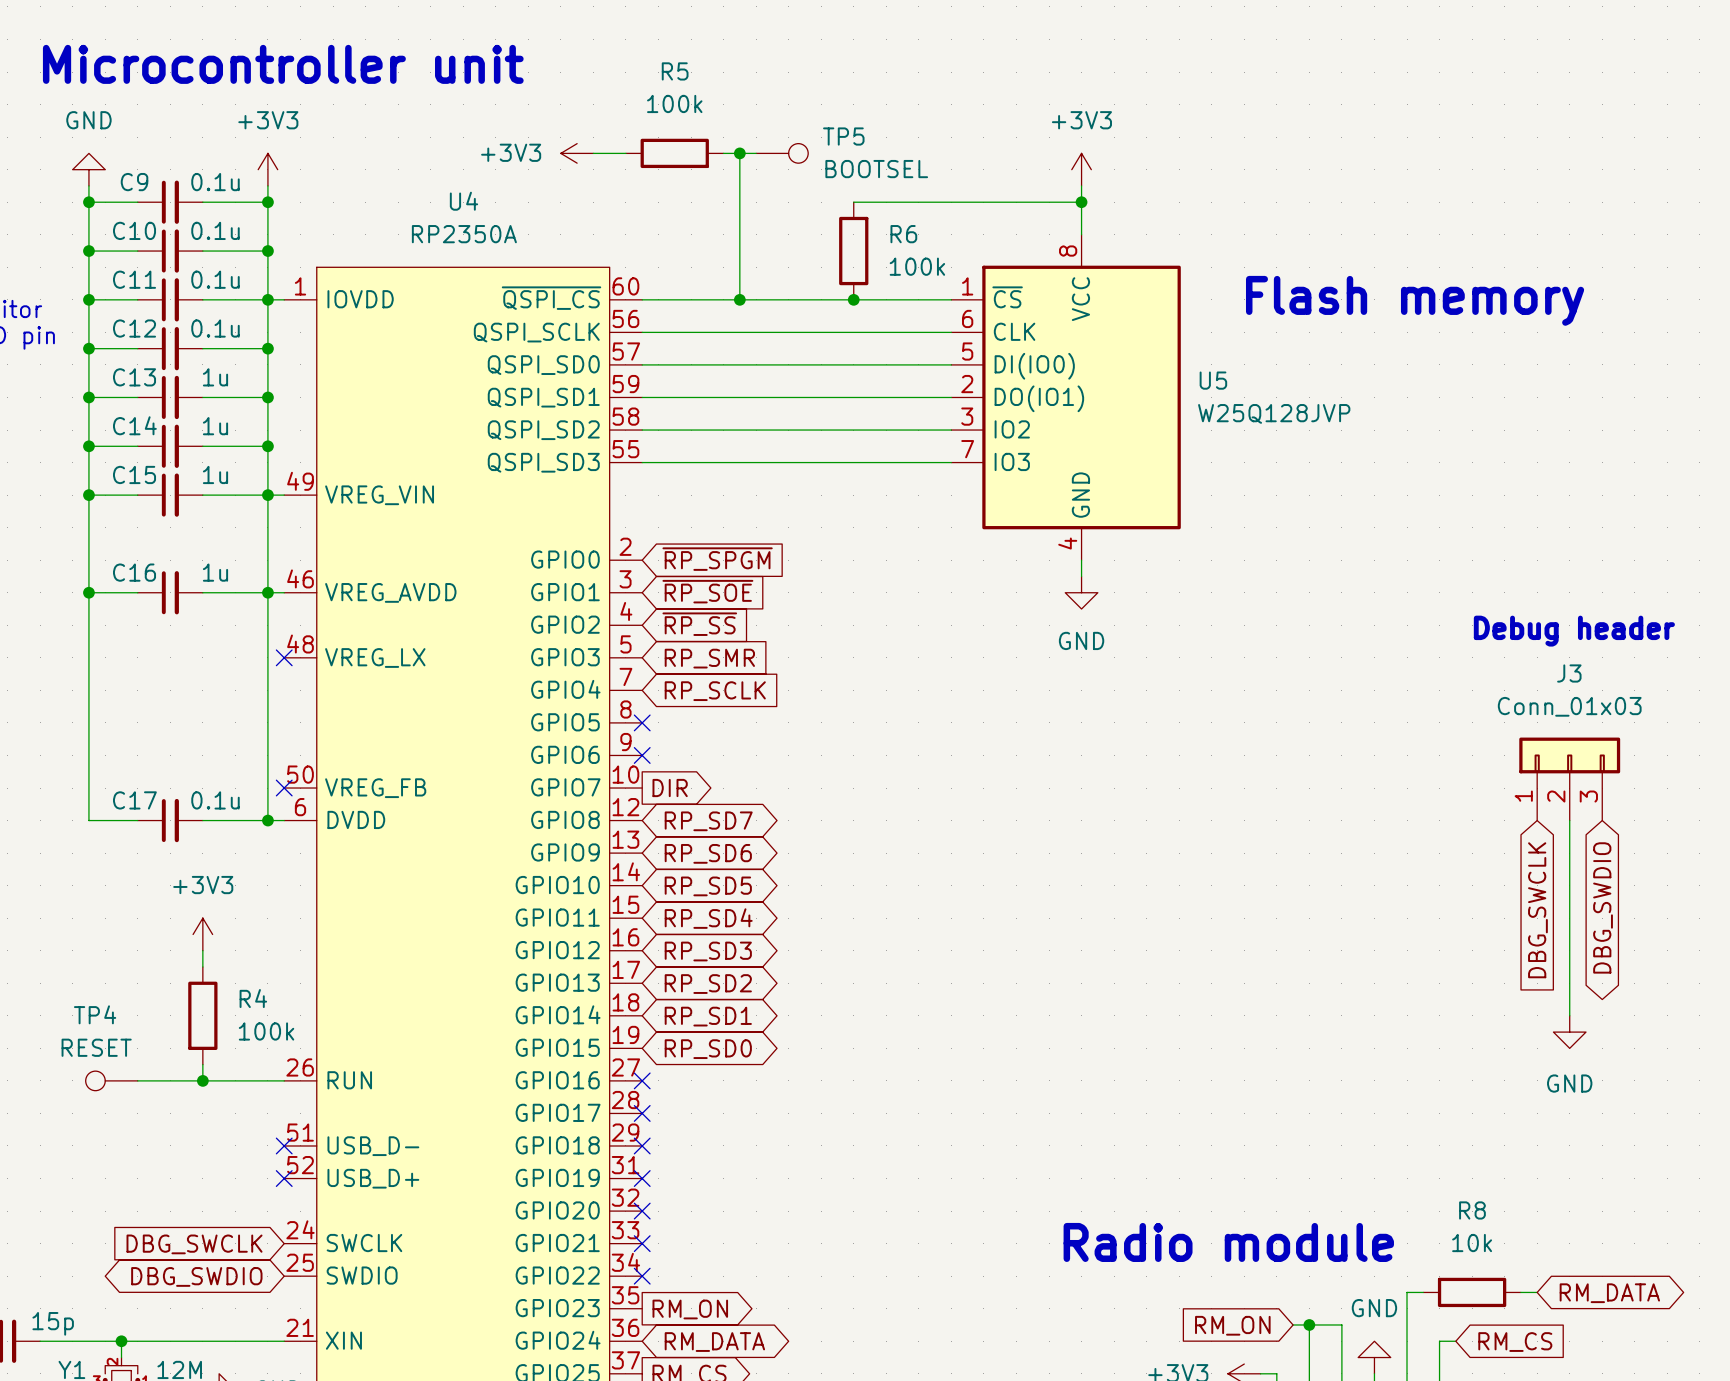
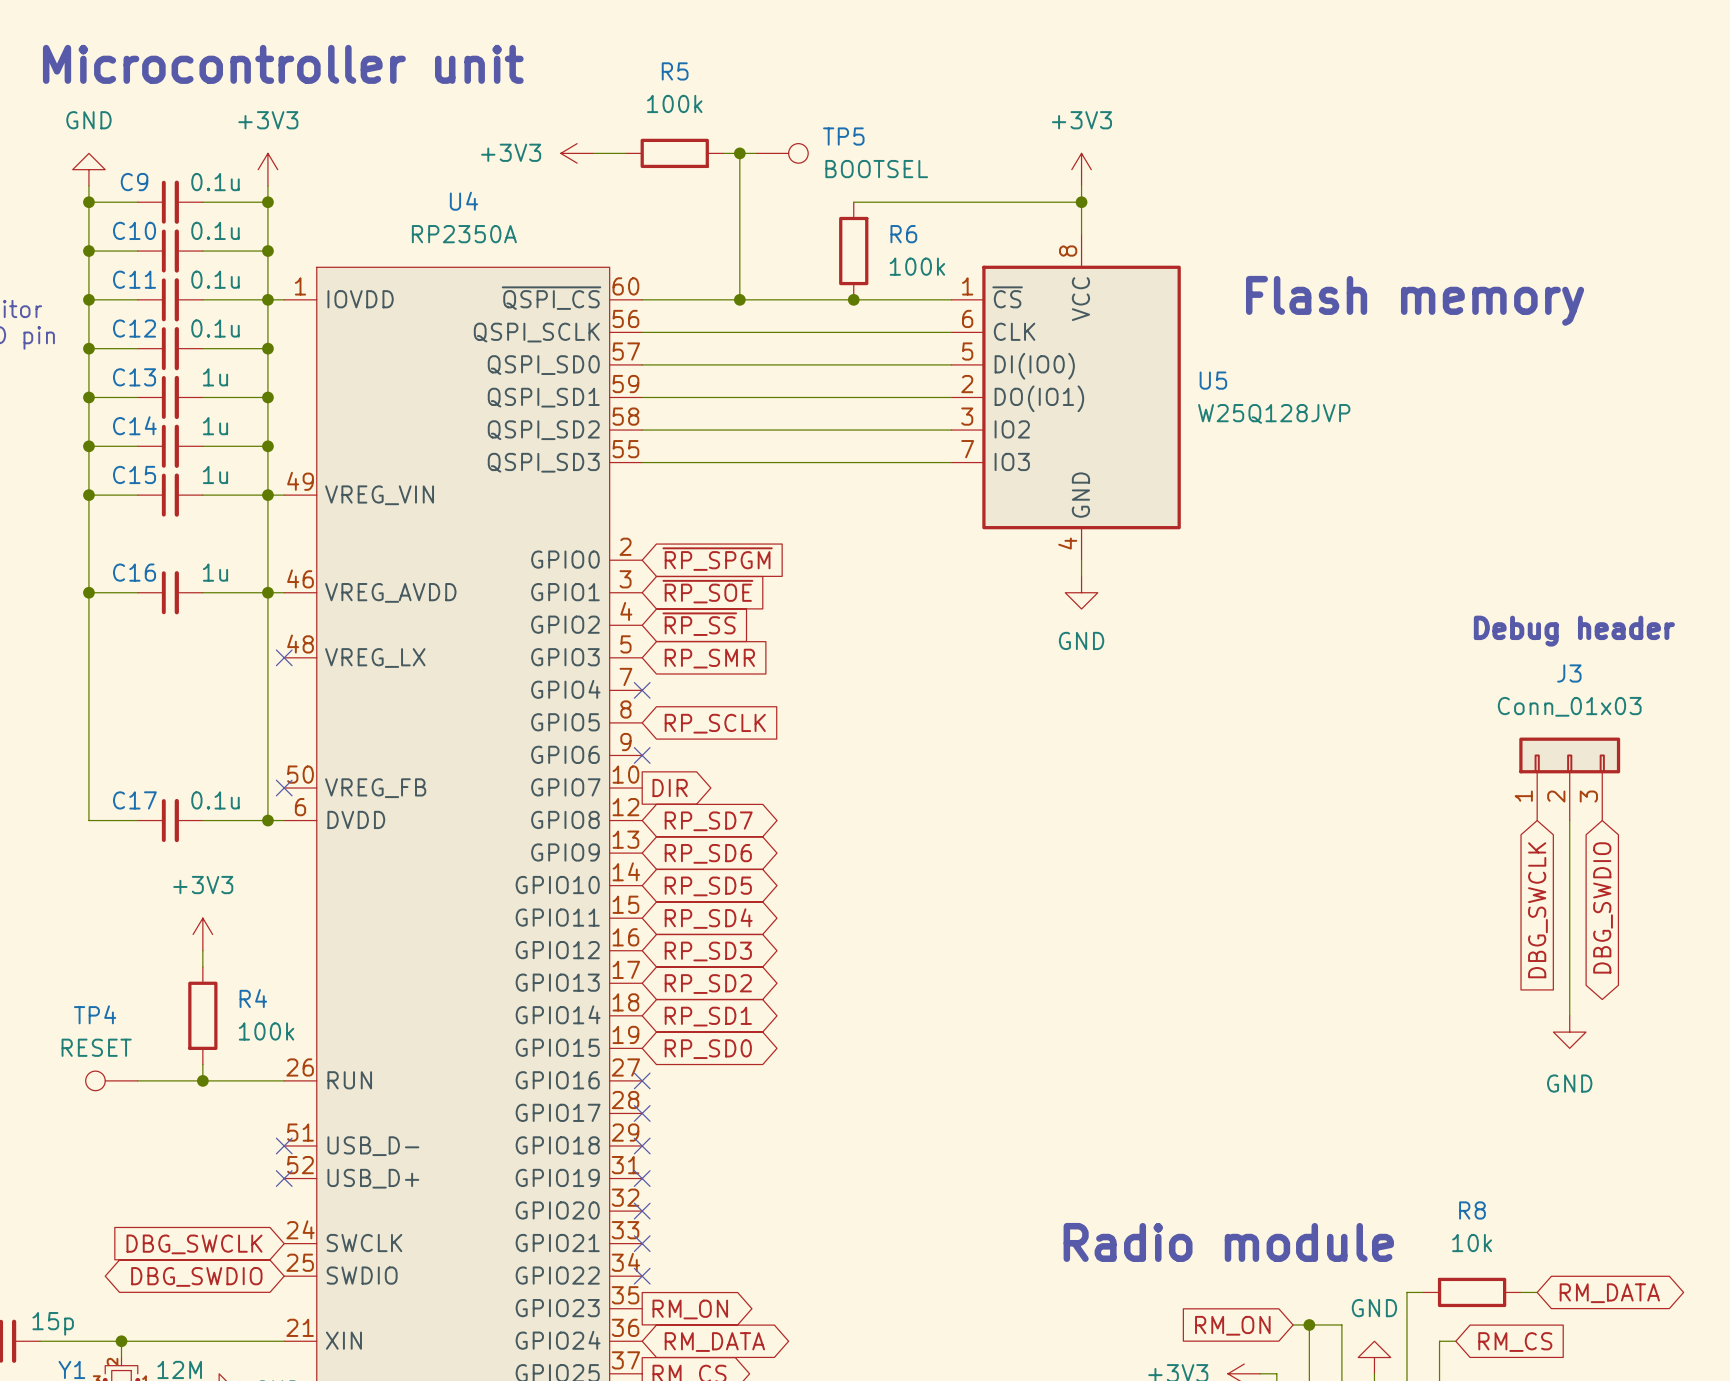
global label position: RP_SCLK (715, 691) -> RP_SCLK (715, 723)
no-connect mark position: (642, 722) -> (642, 690)

